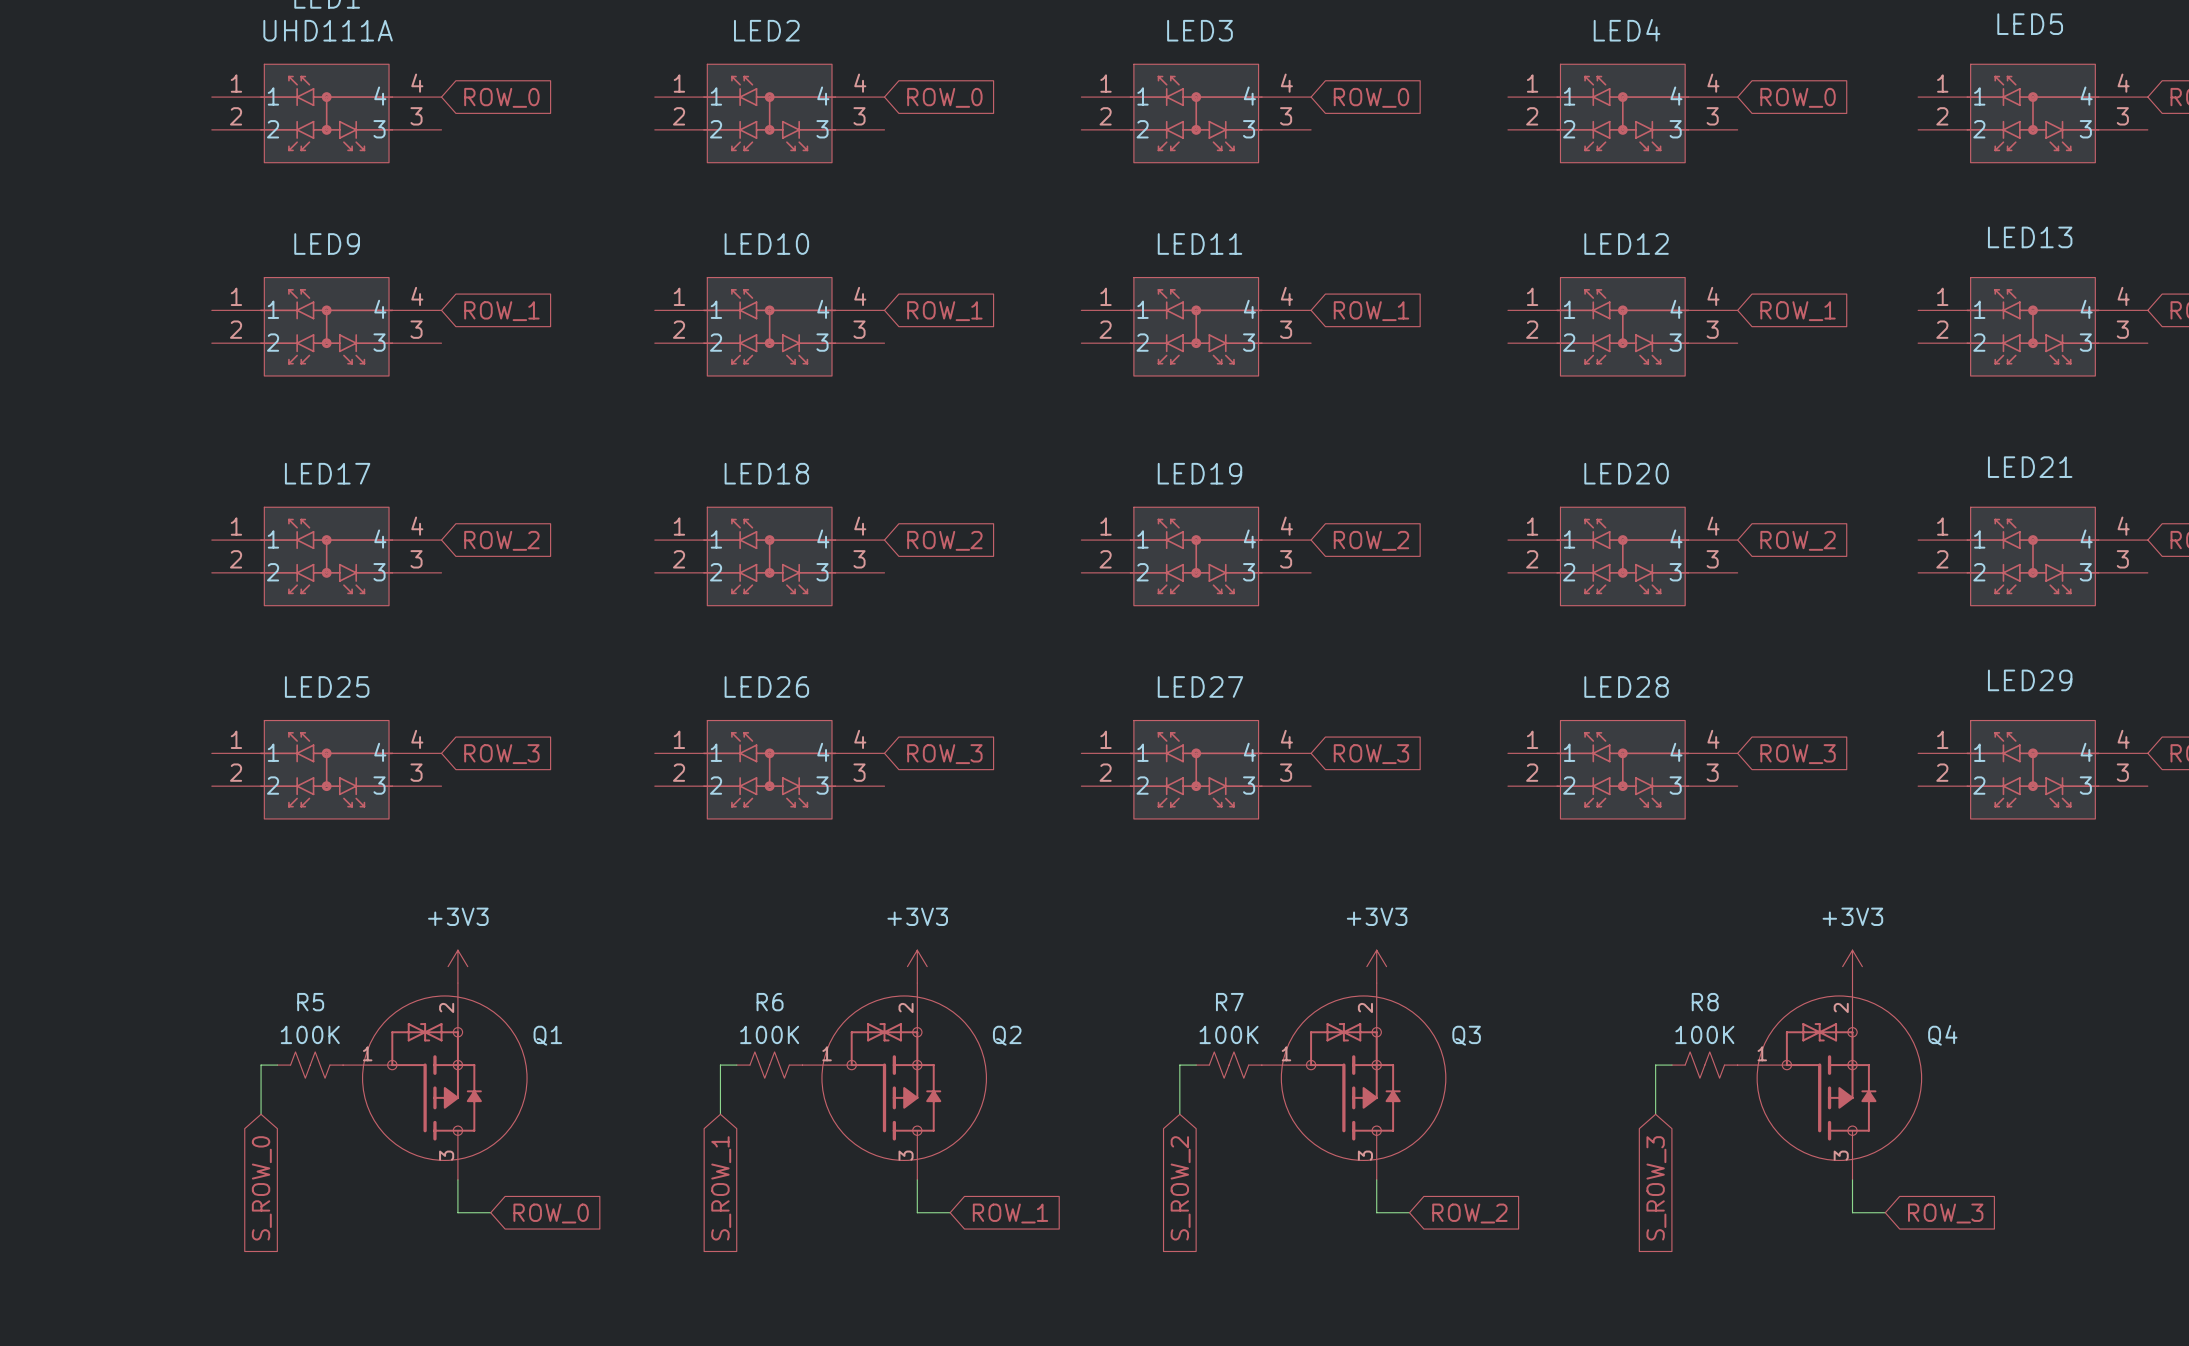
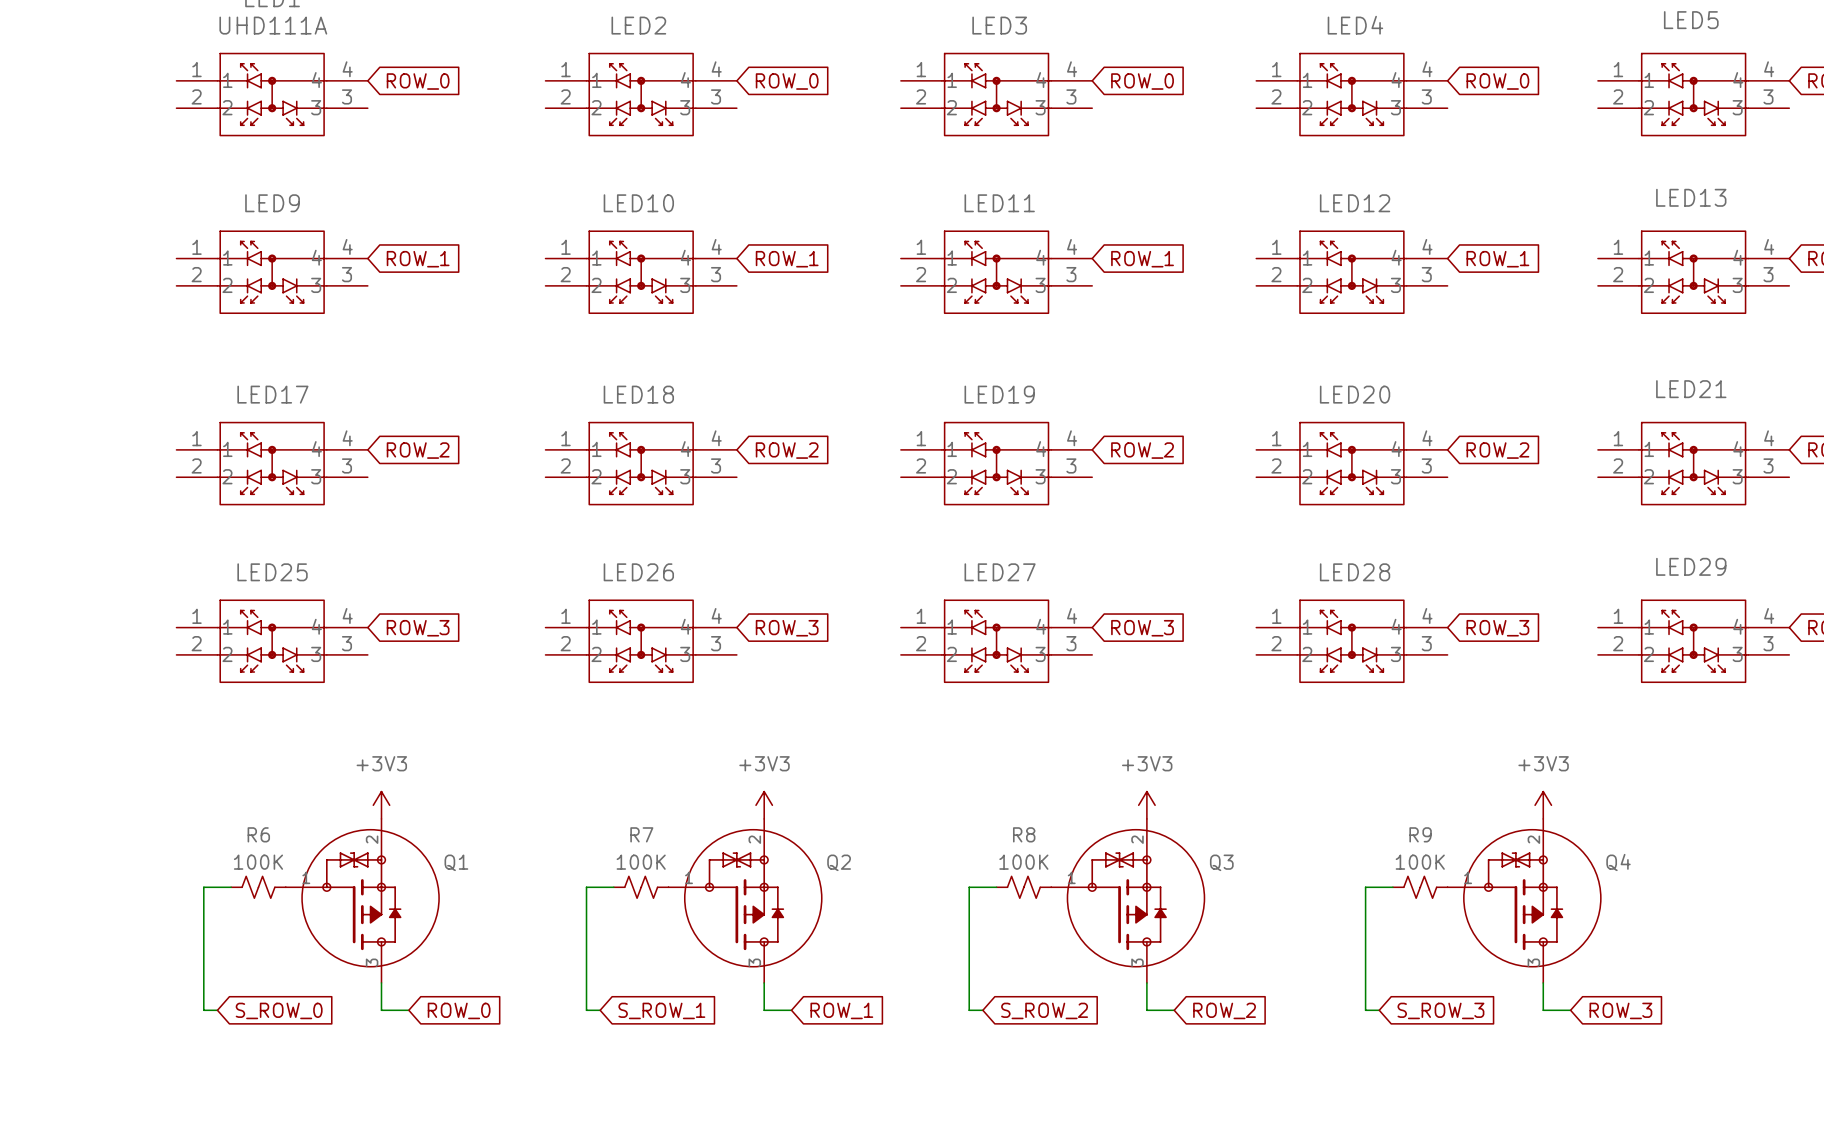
R5 name: R5 (310, 1002) -> R6 (258, 834)
R6 name: R6 (770, 1002) -> R7 (641, 834)
R7 name: R7 (1229, 1002) -> R8 (1024, 834)
R8 name: R8 (1705, 1002) -> R9 (1420, 834)
wire: (261, 1065) (261, 1114) -> (217, 887) (203, 887) (203, 1010) (217, 1010)
wire: (720, 1065) (720, 1114) -> (600, 887) (586, 887) (586, 1010) (600, 1010)
wire: (1179, 1065) (1179, 1114) -> (982, 887) (969, 887) (969, 1010) (982, 1010)
wire: (1655, 1065) (1655, 1114) -> (1379, 887) (1365, 887) (1365, 1010) (1379, 1010)
global label rotation: 0° (261, 1188) -> 90° counterclockwise (279, 1010)
global label rotation: 0° (721, 1188) -> 90° counterclockwise (661, 1010)
global label rotation: 0° (1180, 1188) -> 90° counterclockwise (1044, 1010)
global label rotation: 0° (1656, 1188) -> 90° counterclockwise (1440, 1010)

